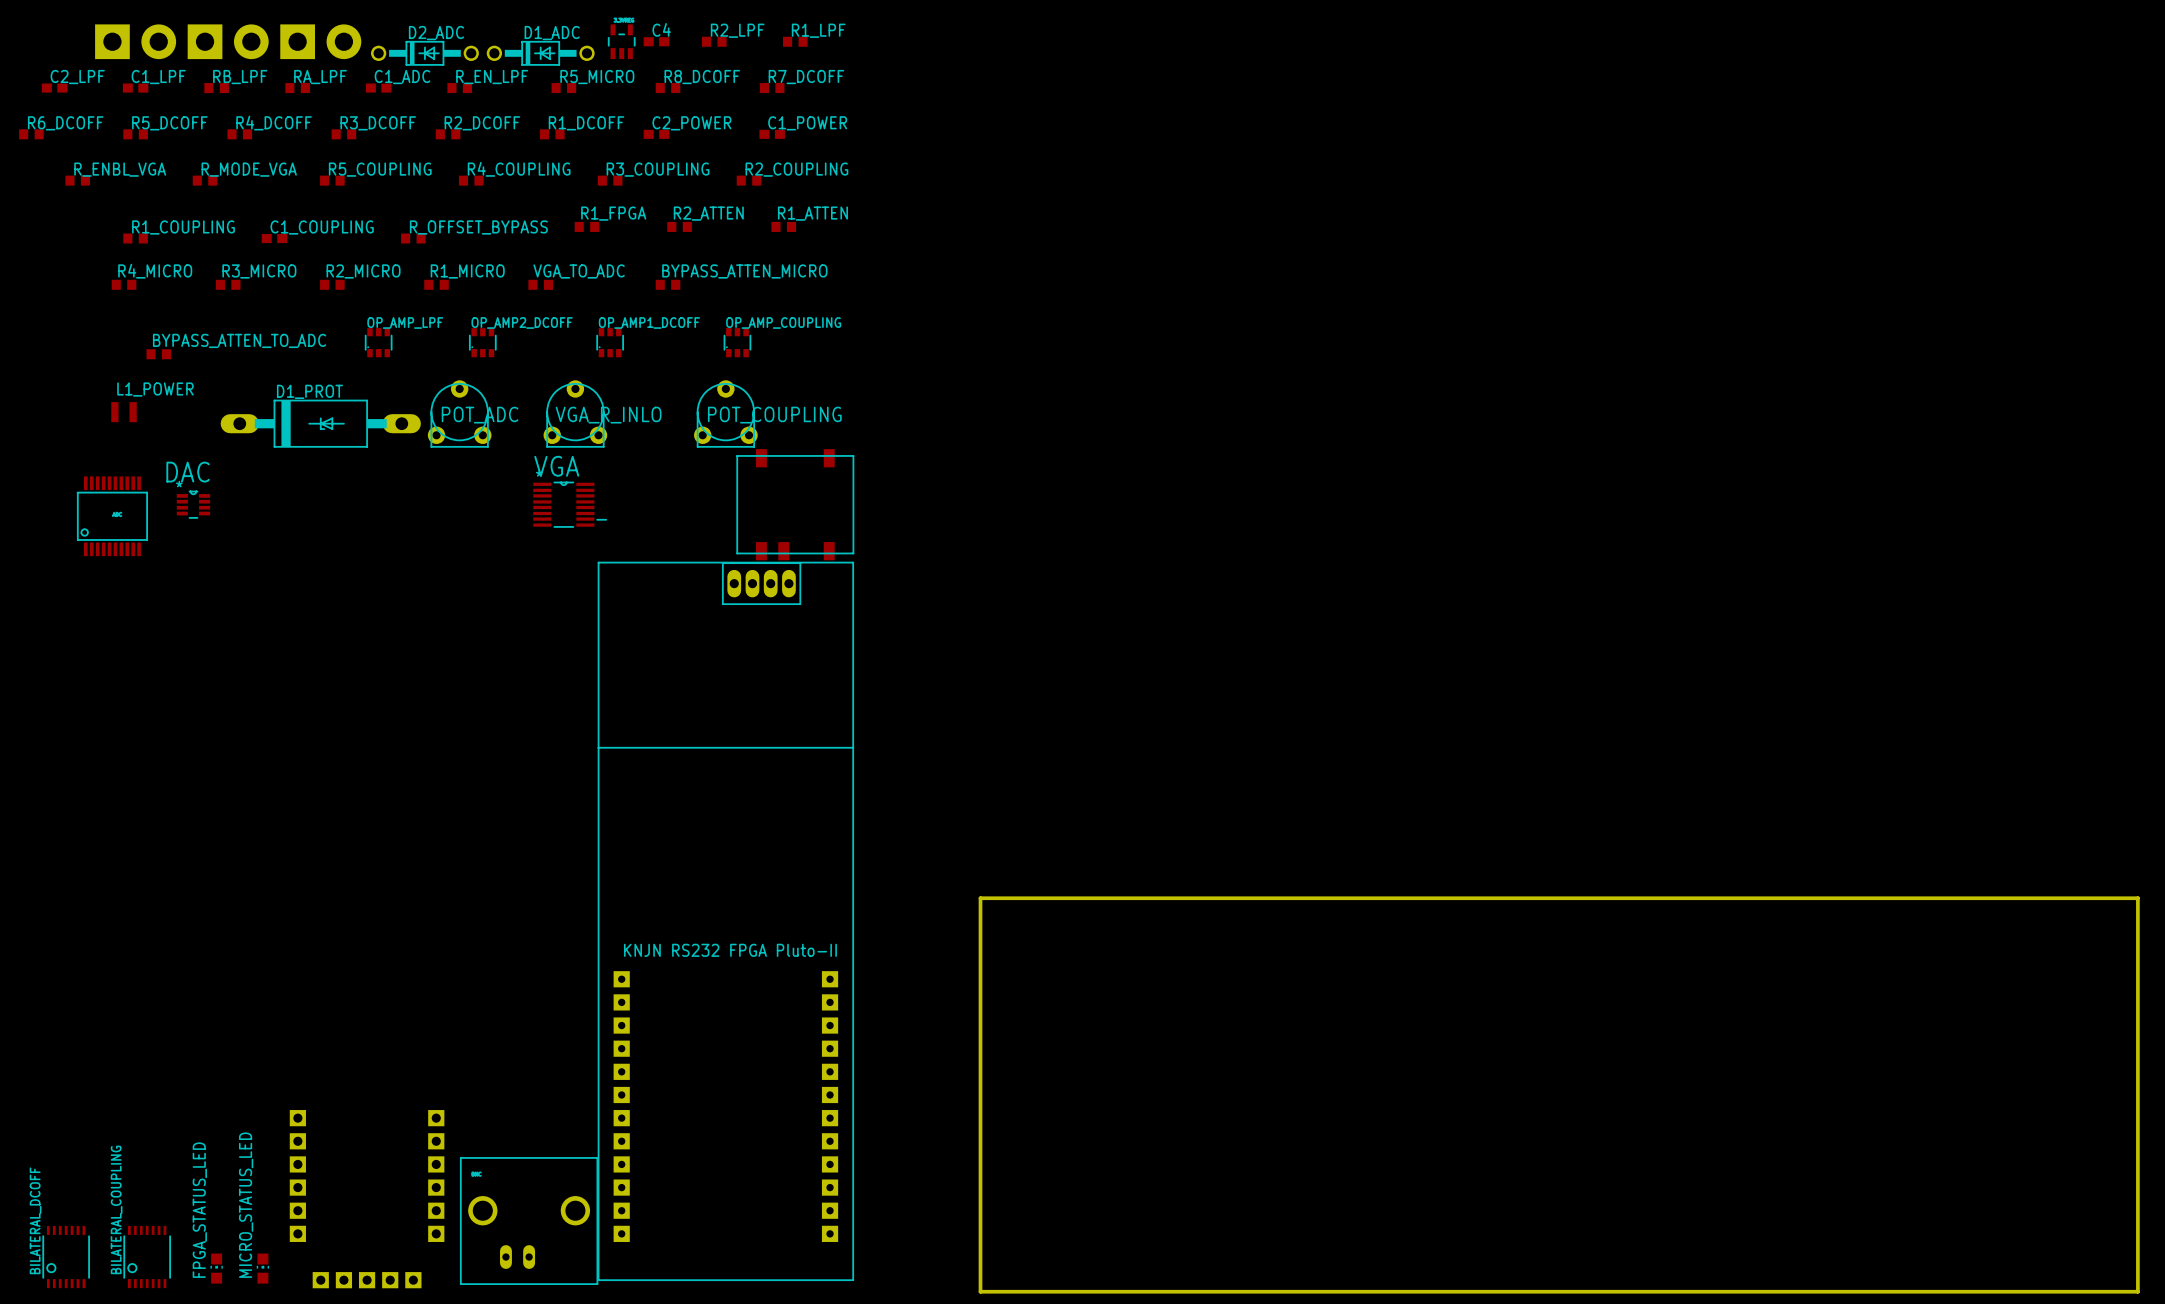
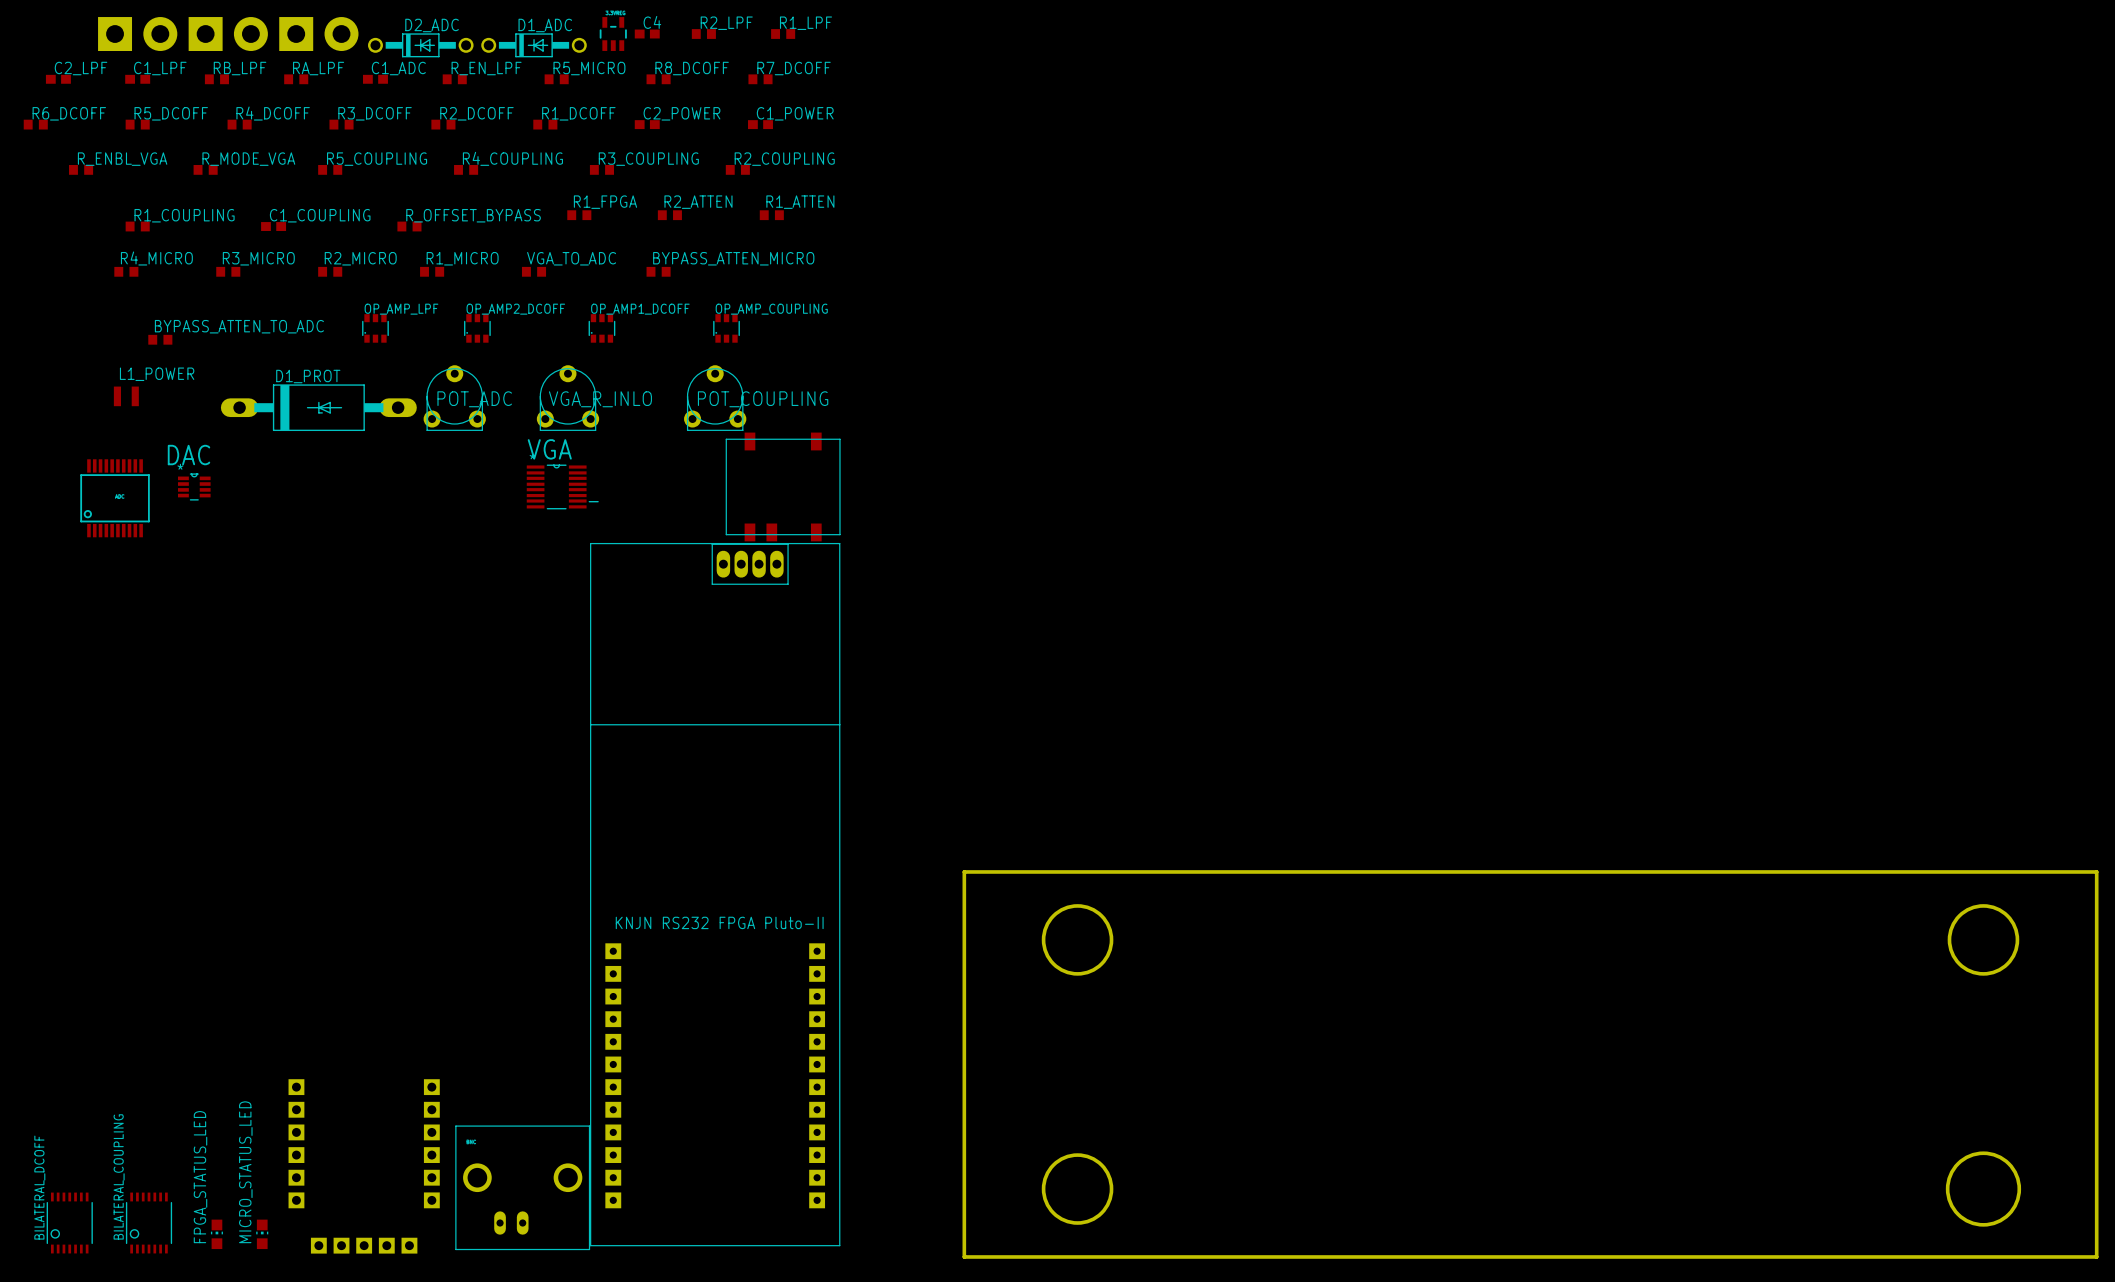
round board edge: none -> [1041, 904, 1114, 976]
round board edge: none -> [1947, 904, 2020, 976]
round board edge: none -> [1945, 1151, 2022, 1227]
round board edge: none -> [1041, 1153, 1114, 1225]

